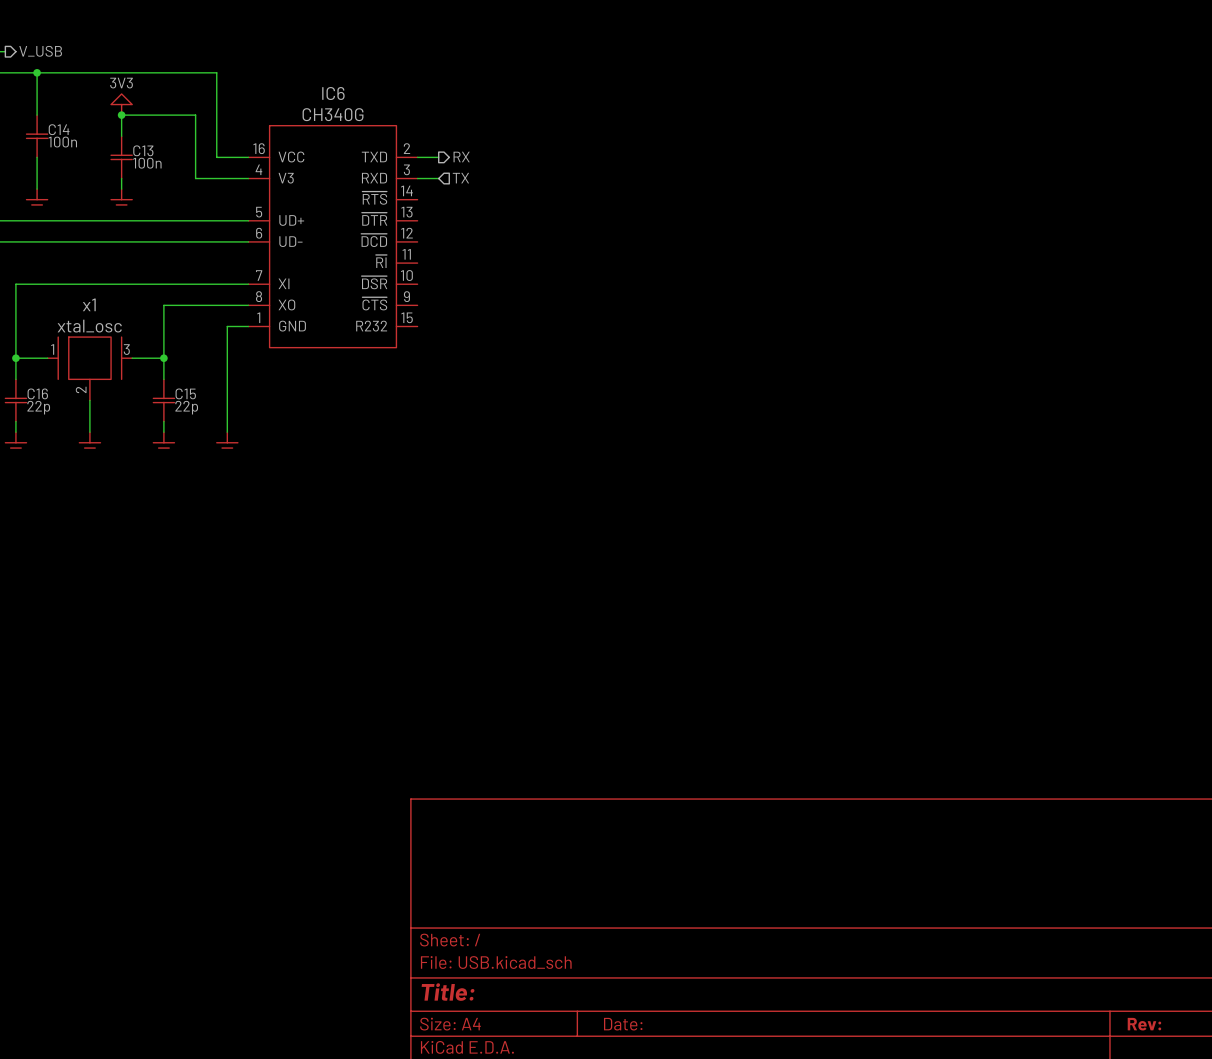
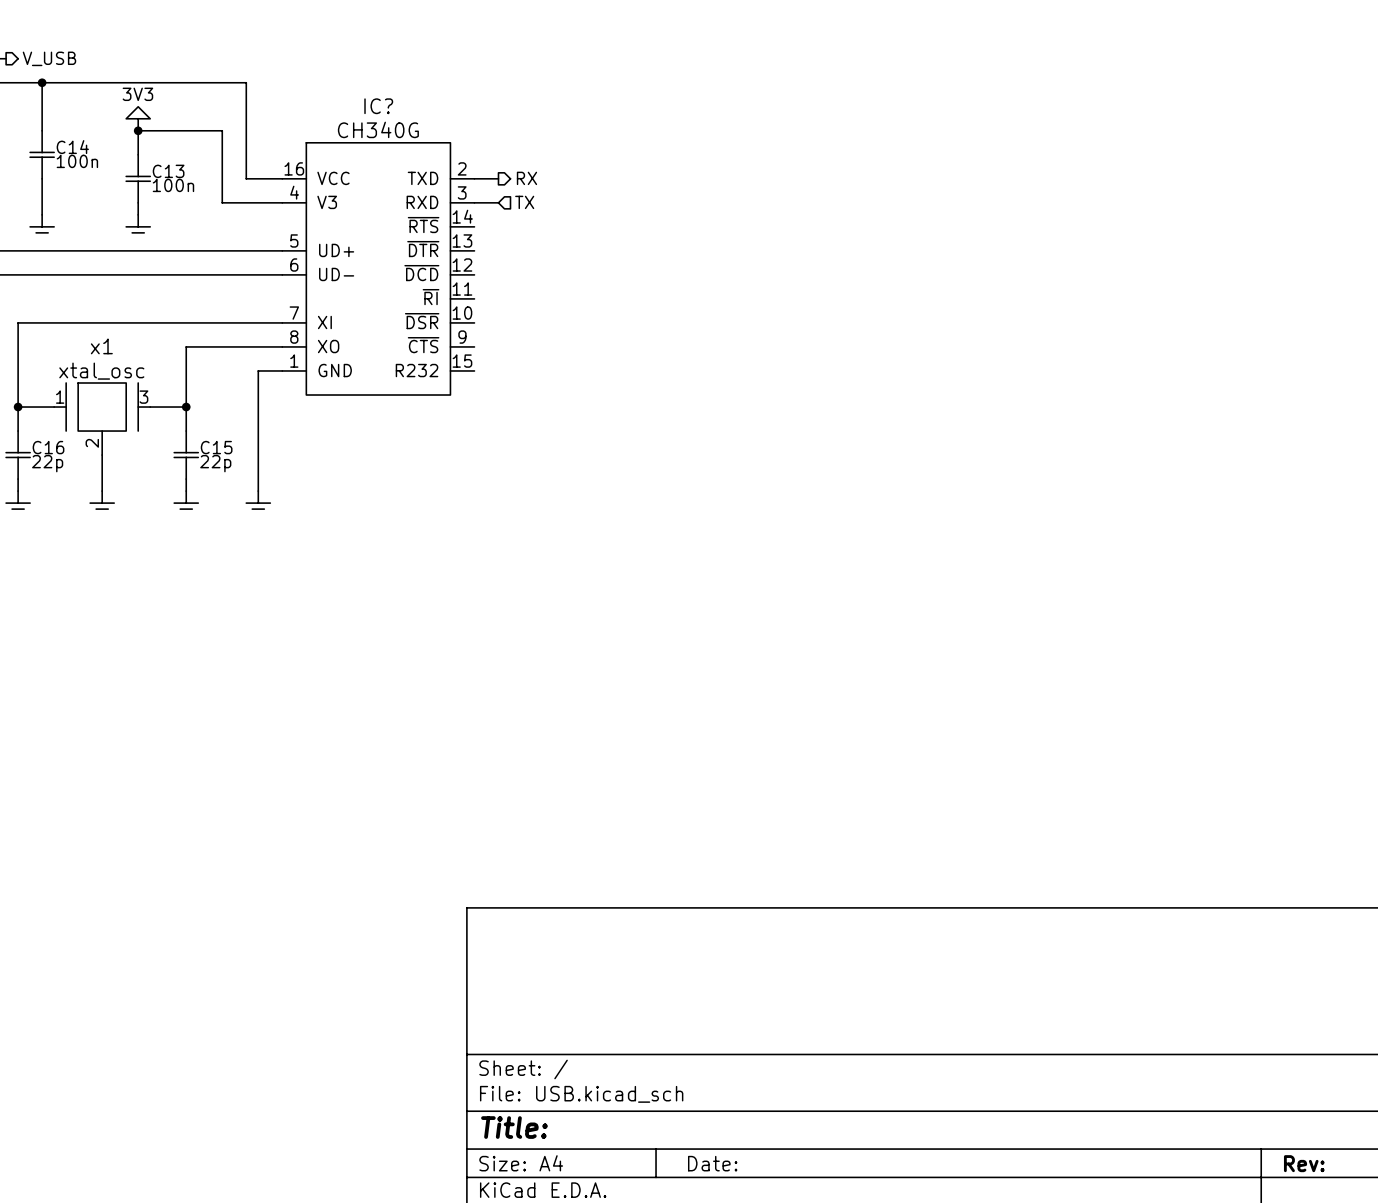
IC6 name: IC6 (333, 93) -> IC? (378, 106)

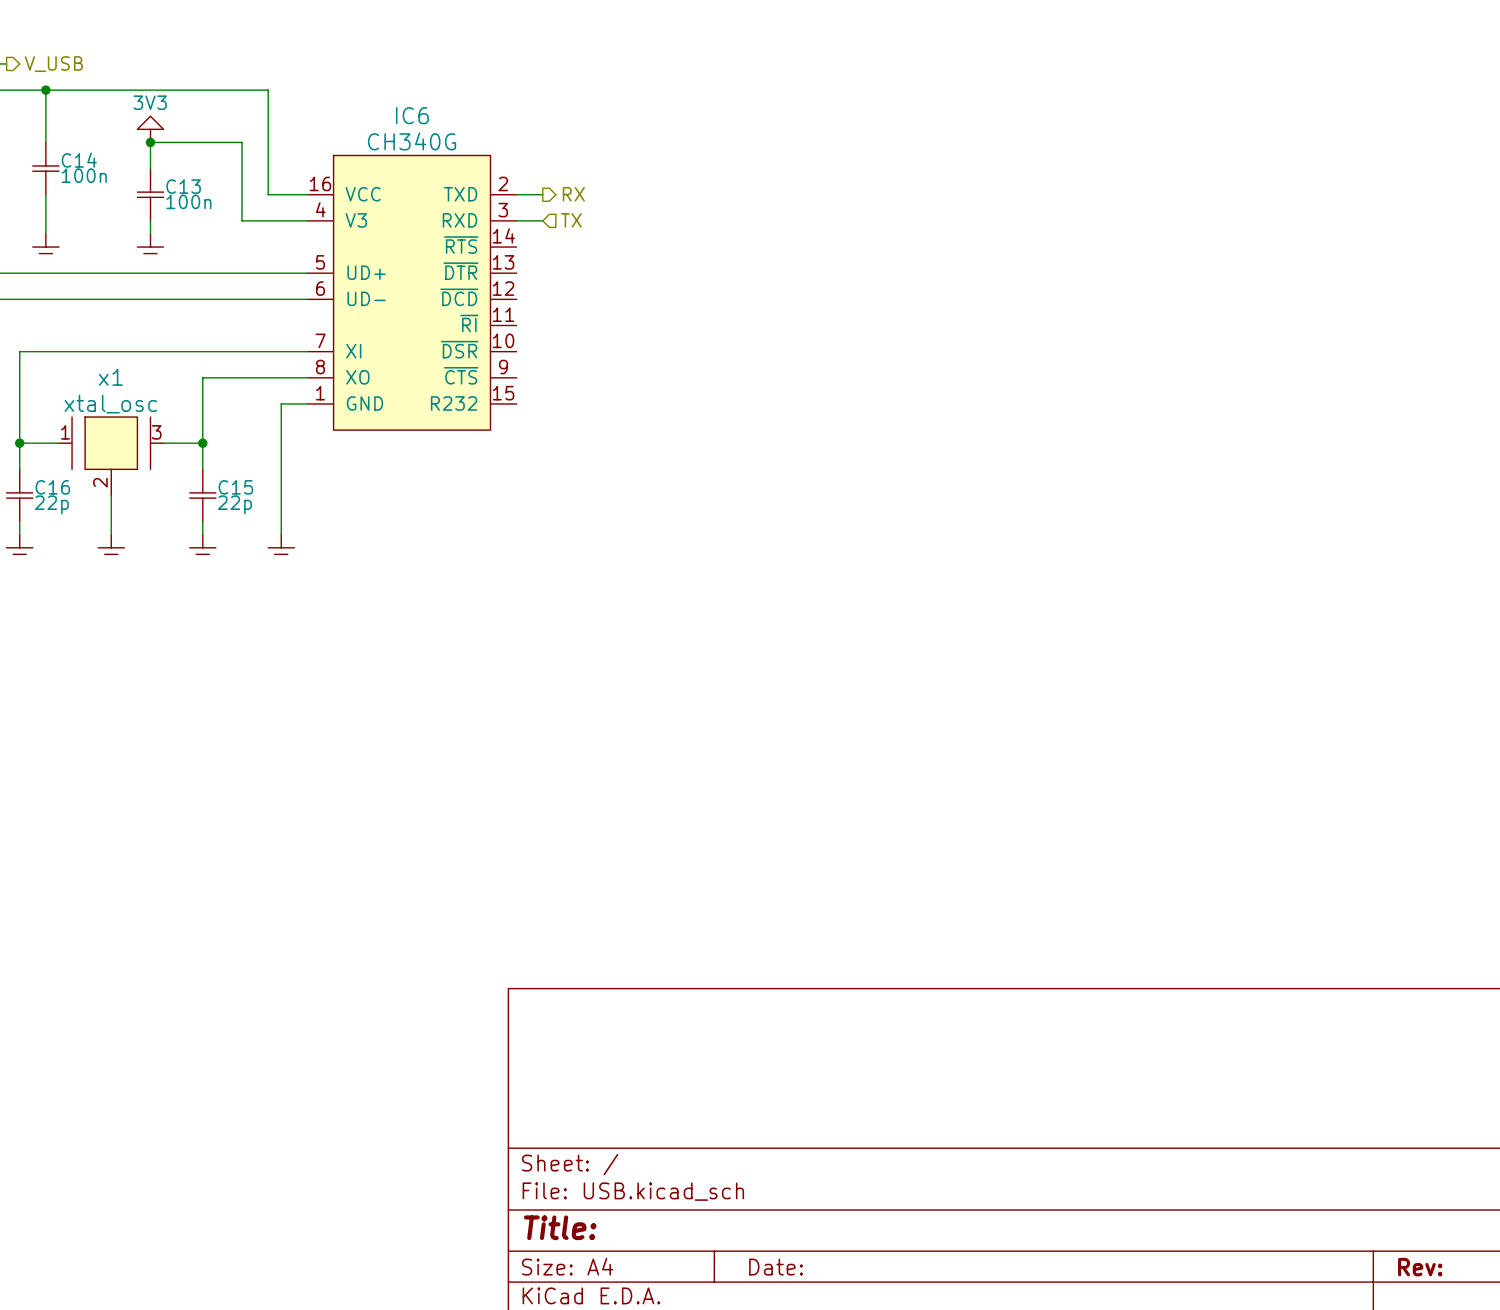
IC? name: IC? (378, 106) -> IC6 (412, 115)

